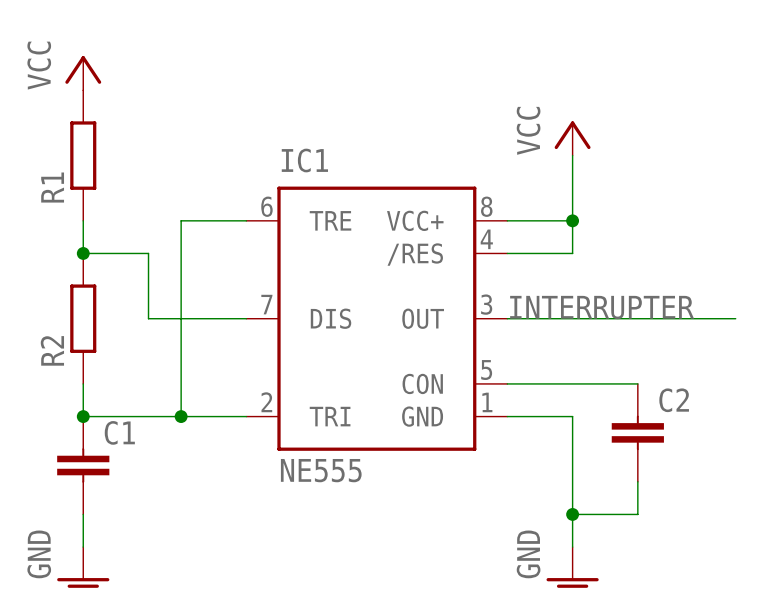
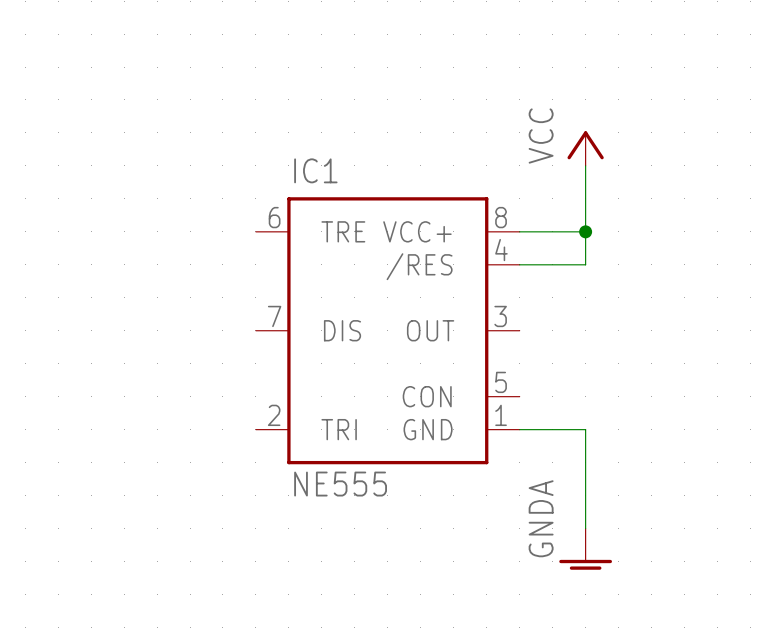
power symbol: VCC (83, 73) -> none
R1: (83, 155) -> none
wire: (83, 220) (83, 253) (148, 253) (148, 318) (246, 318) -> none
wire: (246, 220) (181, 220) (181, 416) -> none
junction: (83, 253) -> none
label: INTERRUPTER (602, 307) -> none
R2: (83, 318) -> none
wire: (507, 318) (735, 318) -> none
wire: (83, 383) (83, 416) (246, 416) -> none
wire: (507, 383) (637, 383) -> none
junction: (83, 416) -> none
junction: (181, 416) -> none
C2: (637, 432) -> none
C1: (83, 465) -> none
wire: (637, 481) (637, 514) (572, 514) (572, 547) -> none
wire: (83, 514) (83, 547) -> none
junction: (572, 514) -> none
power symbol: none -> GNDA (585, 549)
power symbol: GND (83, 567) -> none
power symbol: GND (572, 567) -> none

